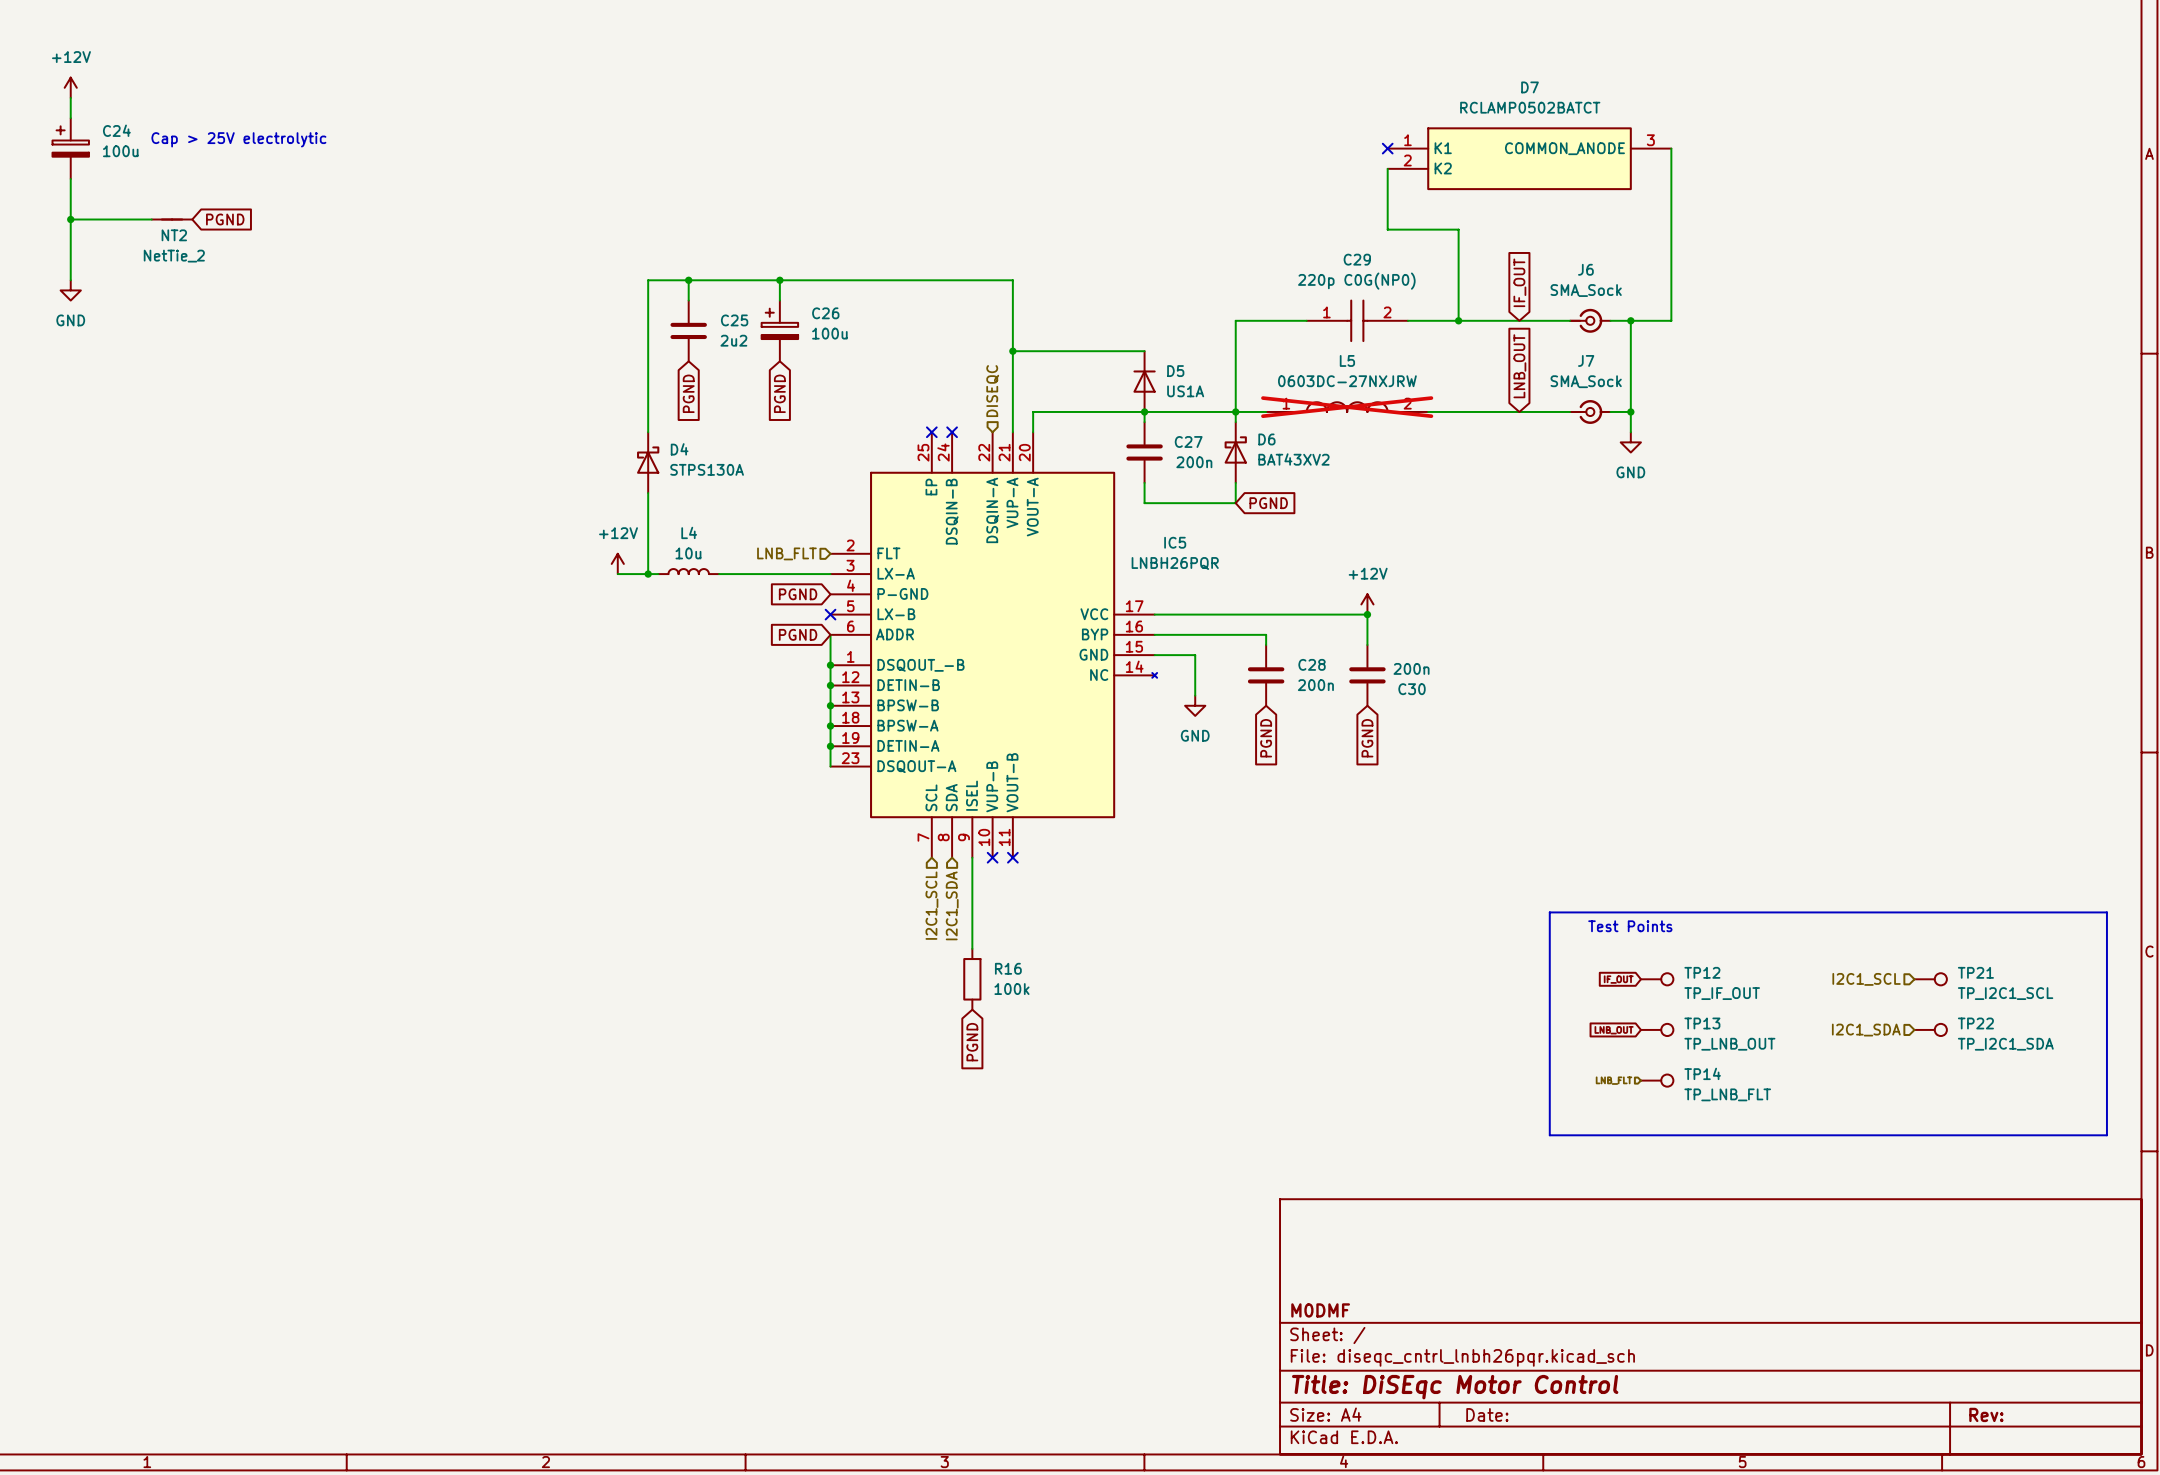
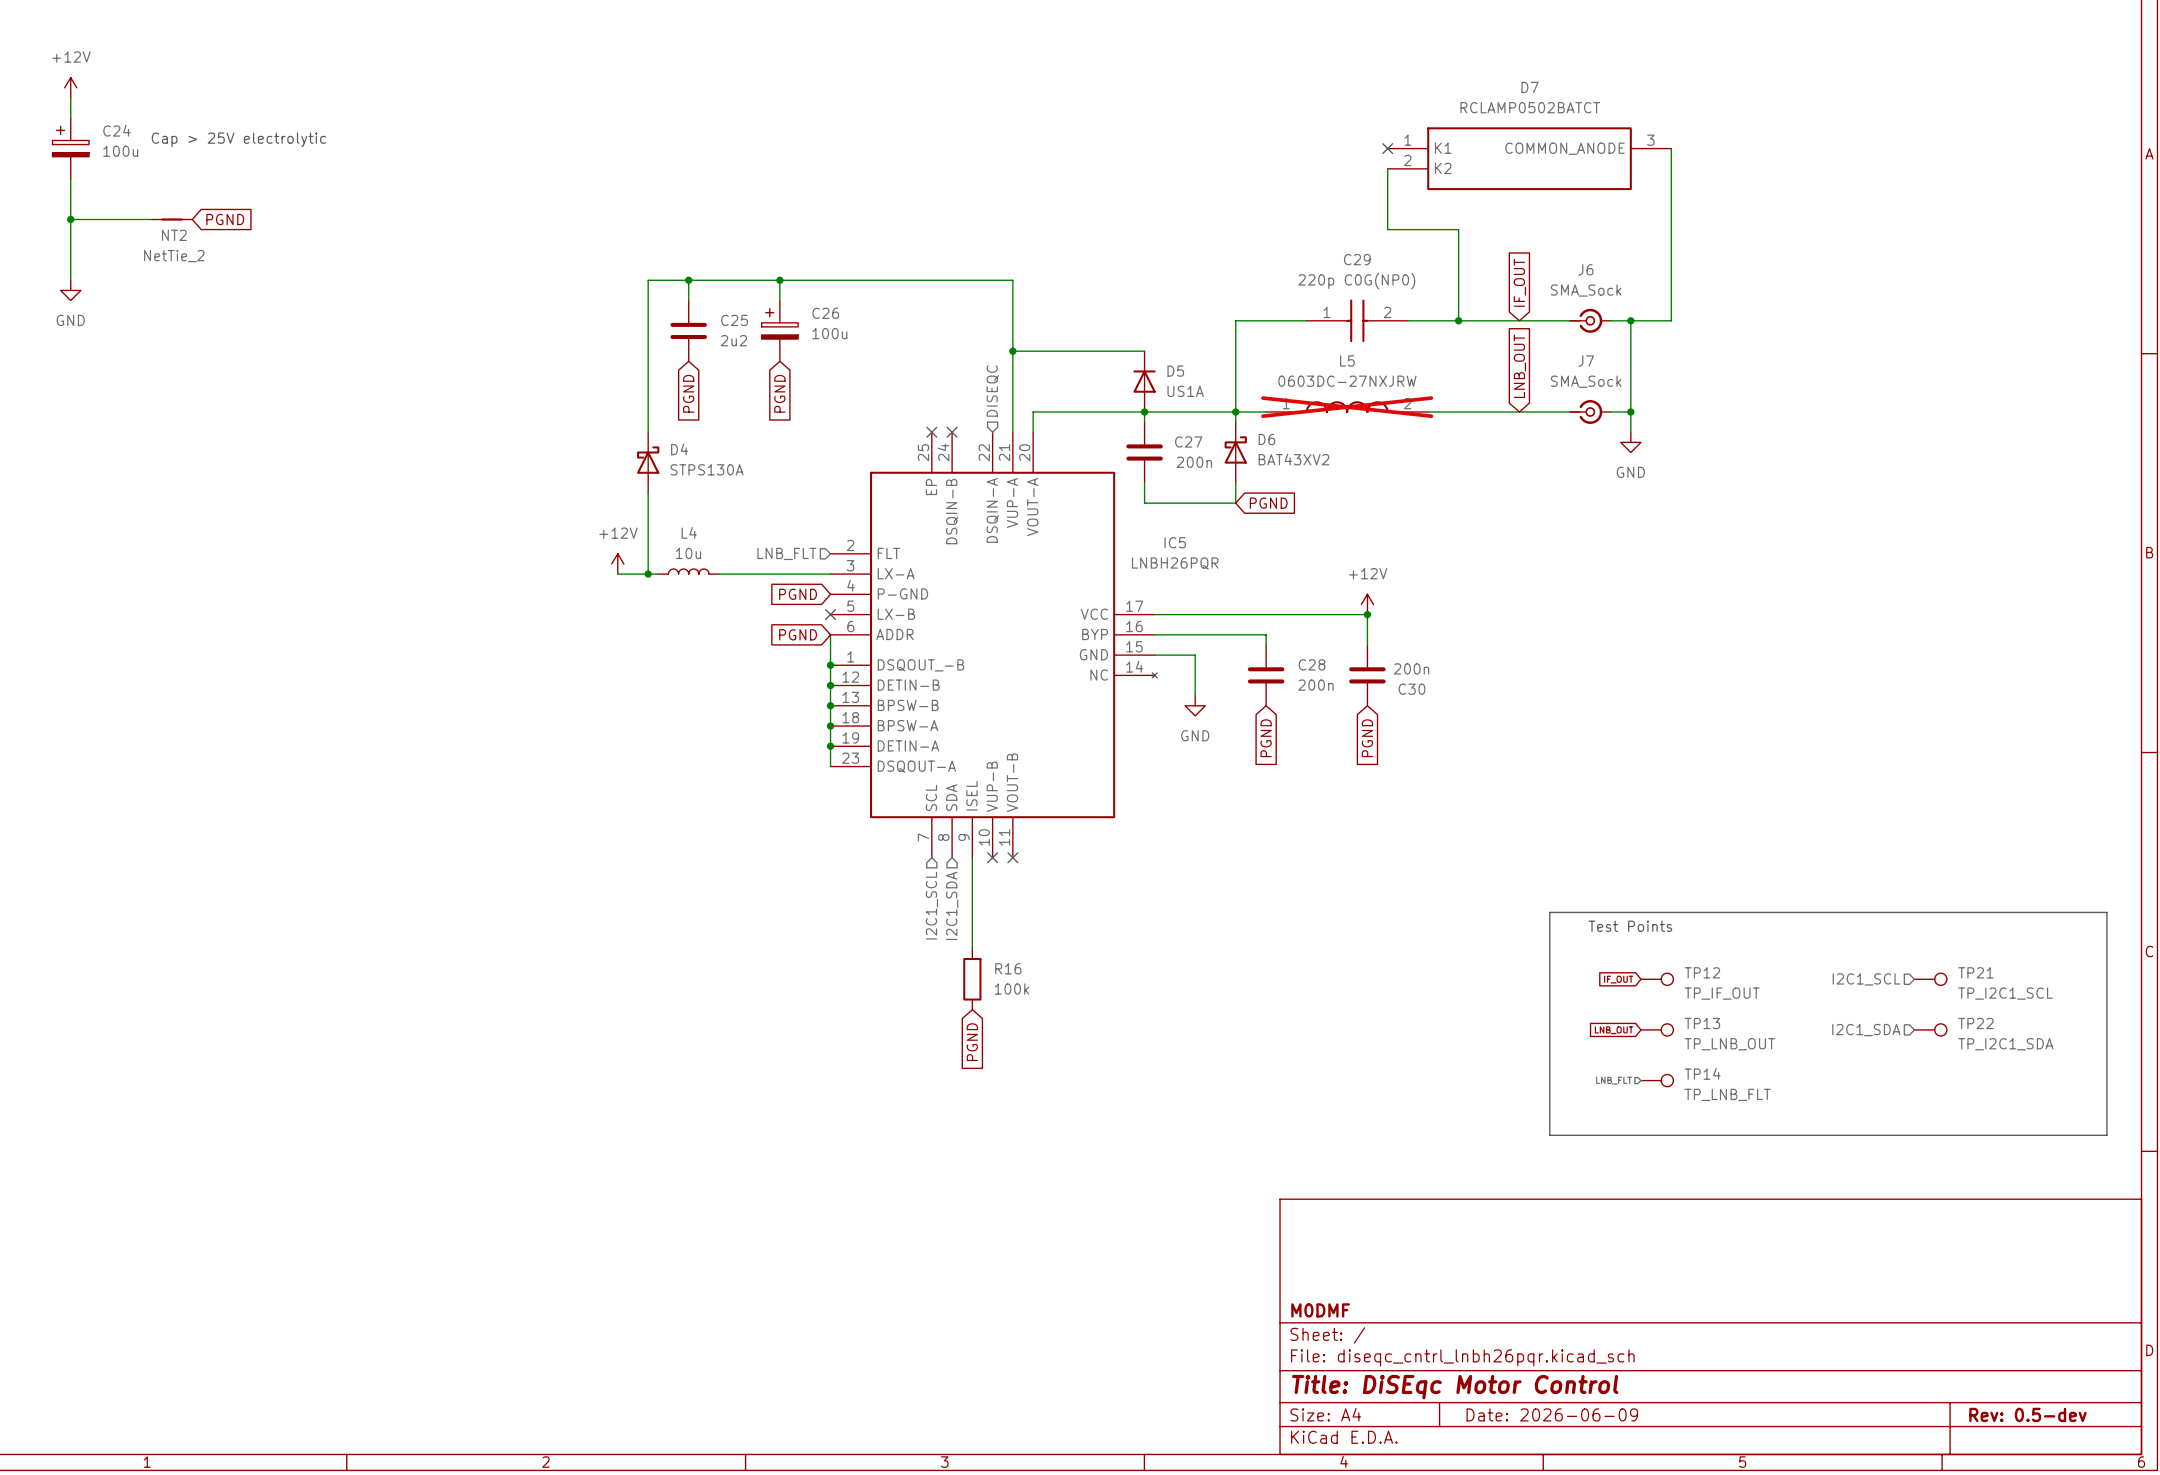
title block: Date: (1487, 1414) -> Date: 2026-06-09 (1552, 1414)
title block: Rev: (1986, 1414) -> Rev: 0.5-dev (2027, 1414)

